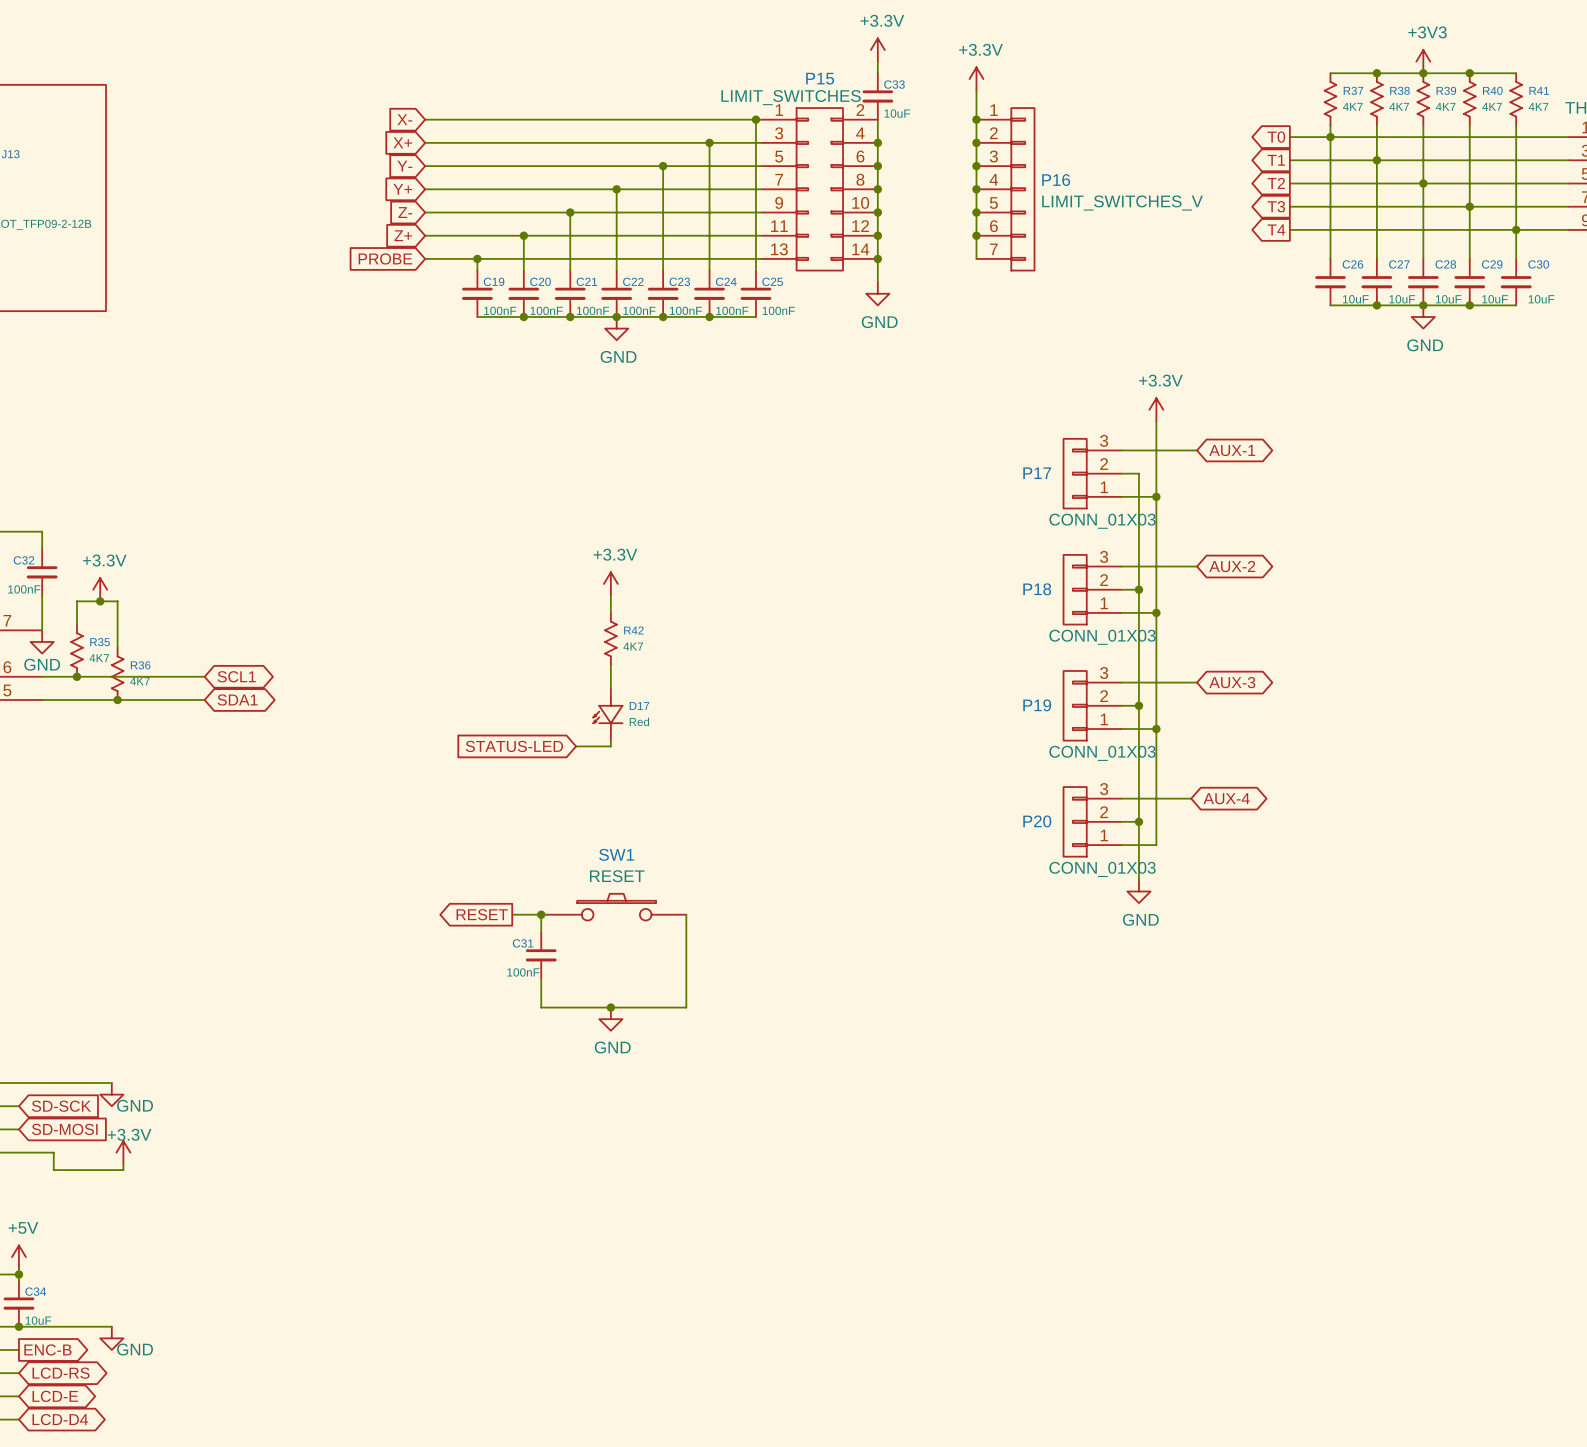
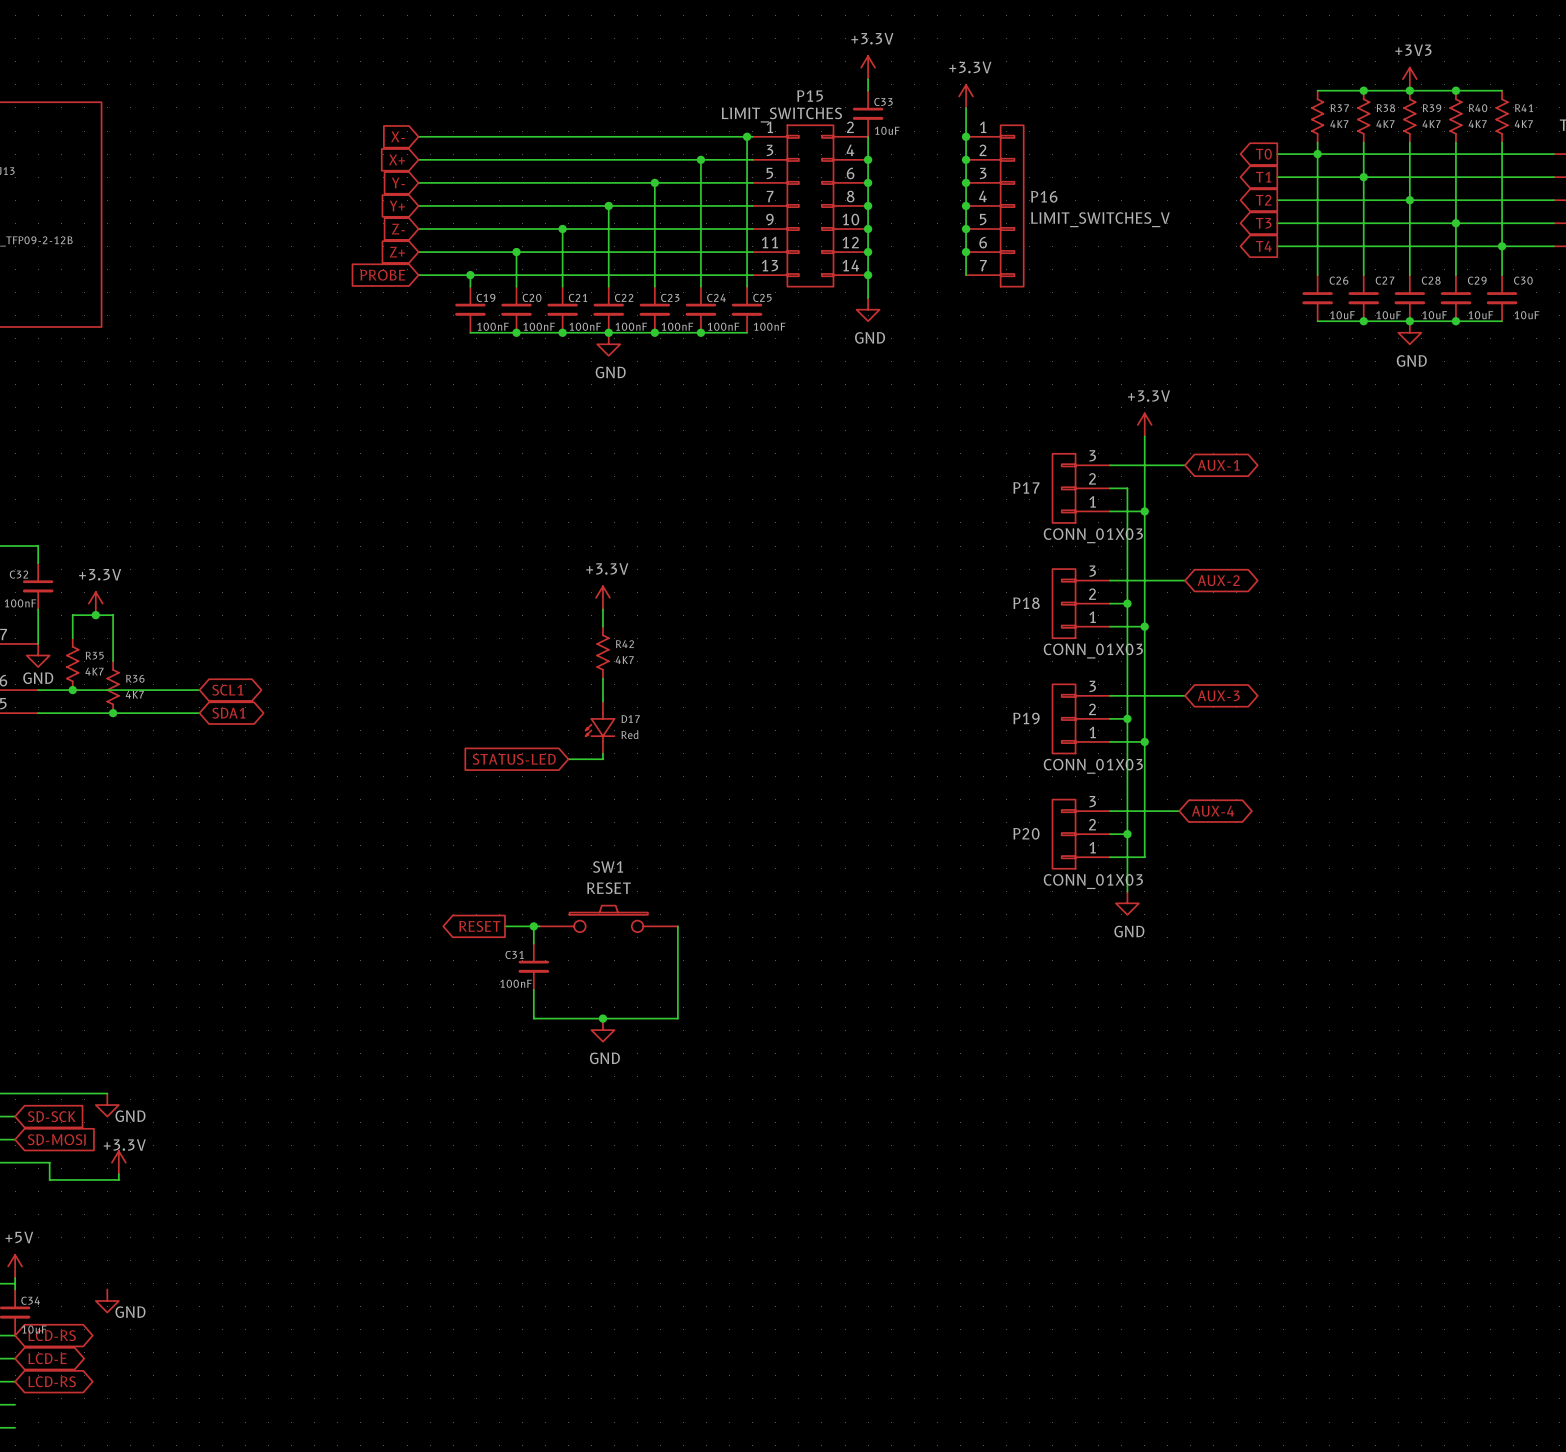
junction: (18, 1274) -> none
wire: (18, 1326) (111, 1326) -> none
junction: (18, 1326) -> none
global label: none -> LCD-RS (52, 1335)
power symbol position: GND (111, 1338) -> GND (107, 1301)
global label shape: output (47, 1349) -> bidirectional (47, 1358)
global label: ENC-B (47, 1349) -> LCD-E (47, 1358)
global label: LCD-E (55, 1396) -> none
global label: LCD-D4 (60, 1419) -> none

